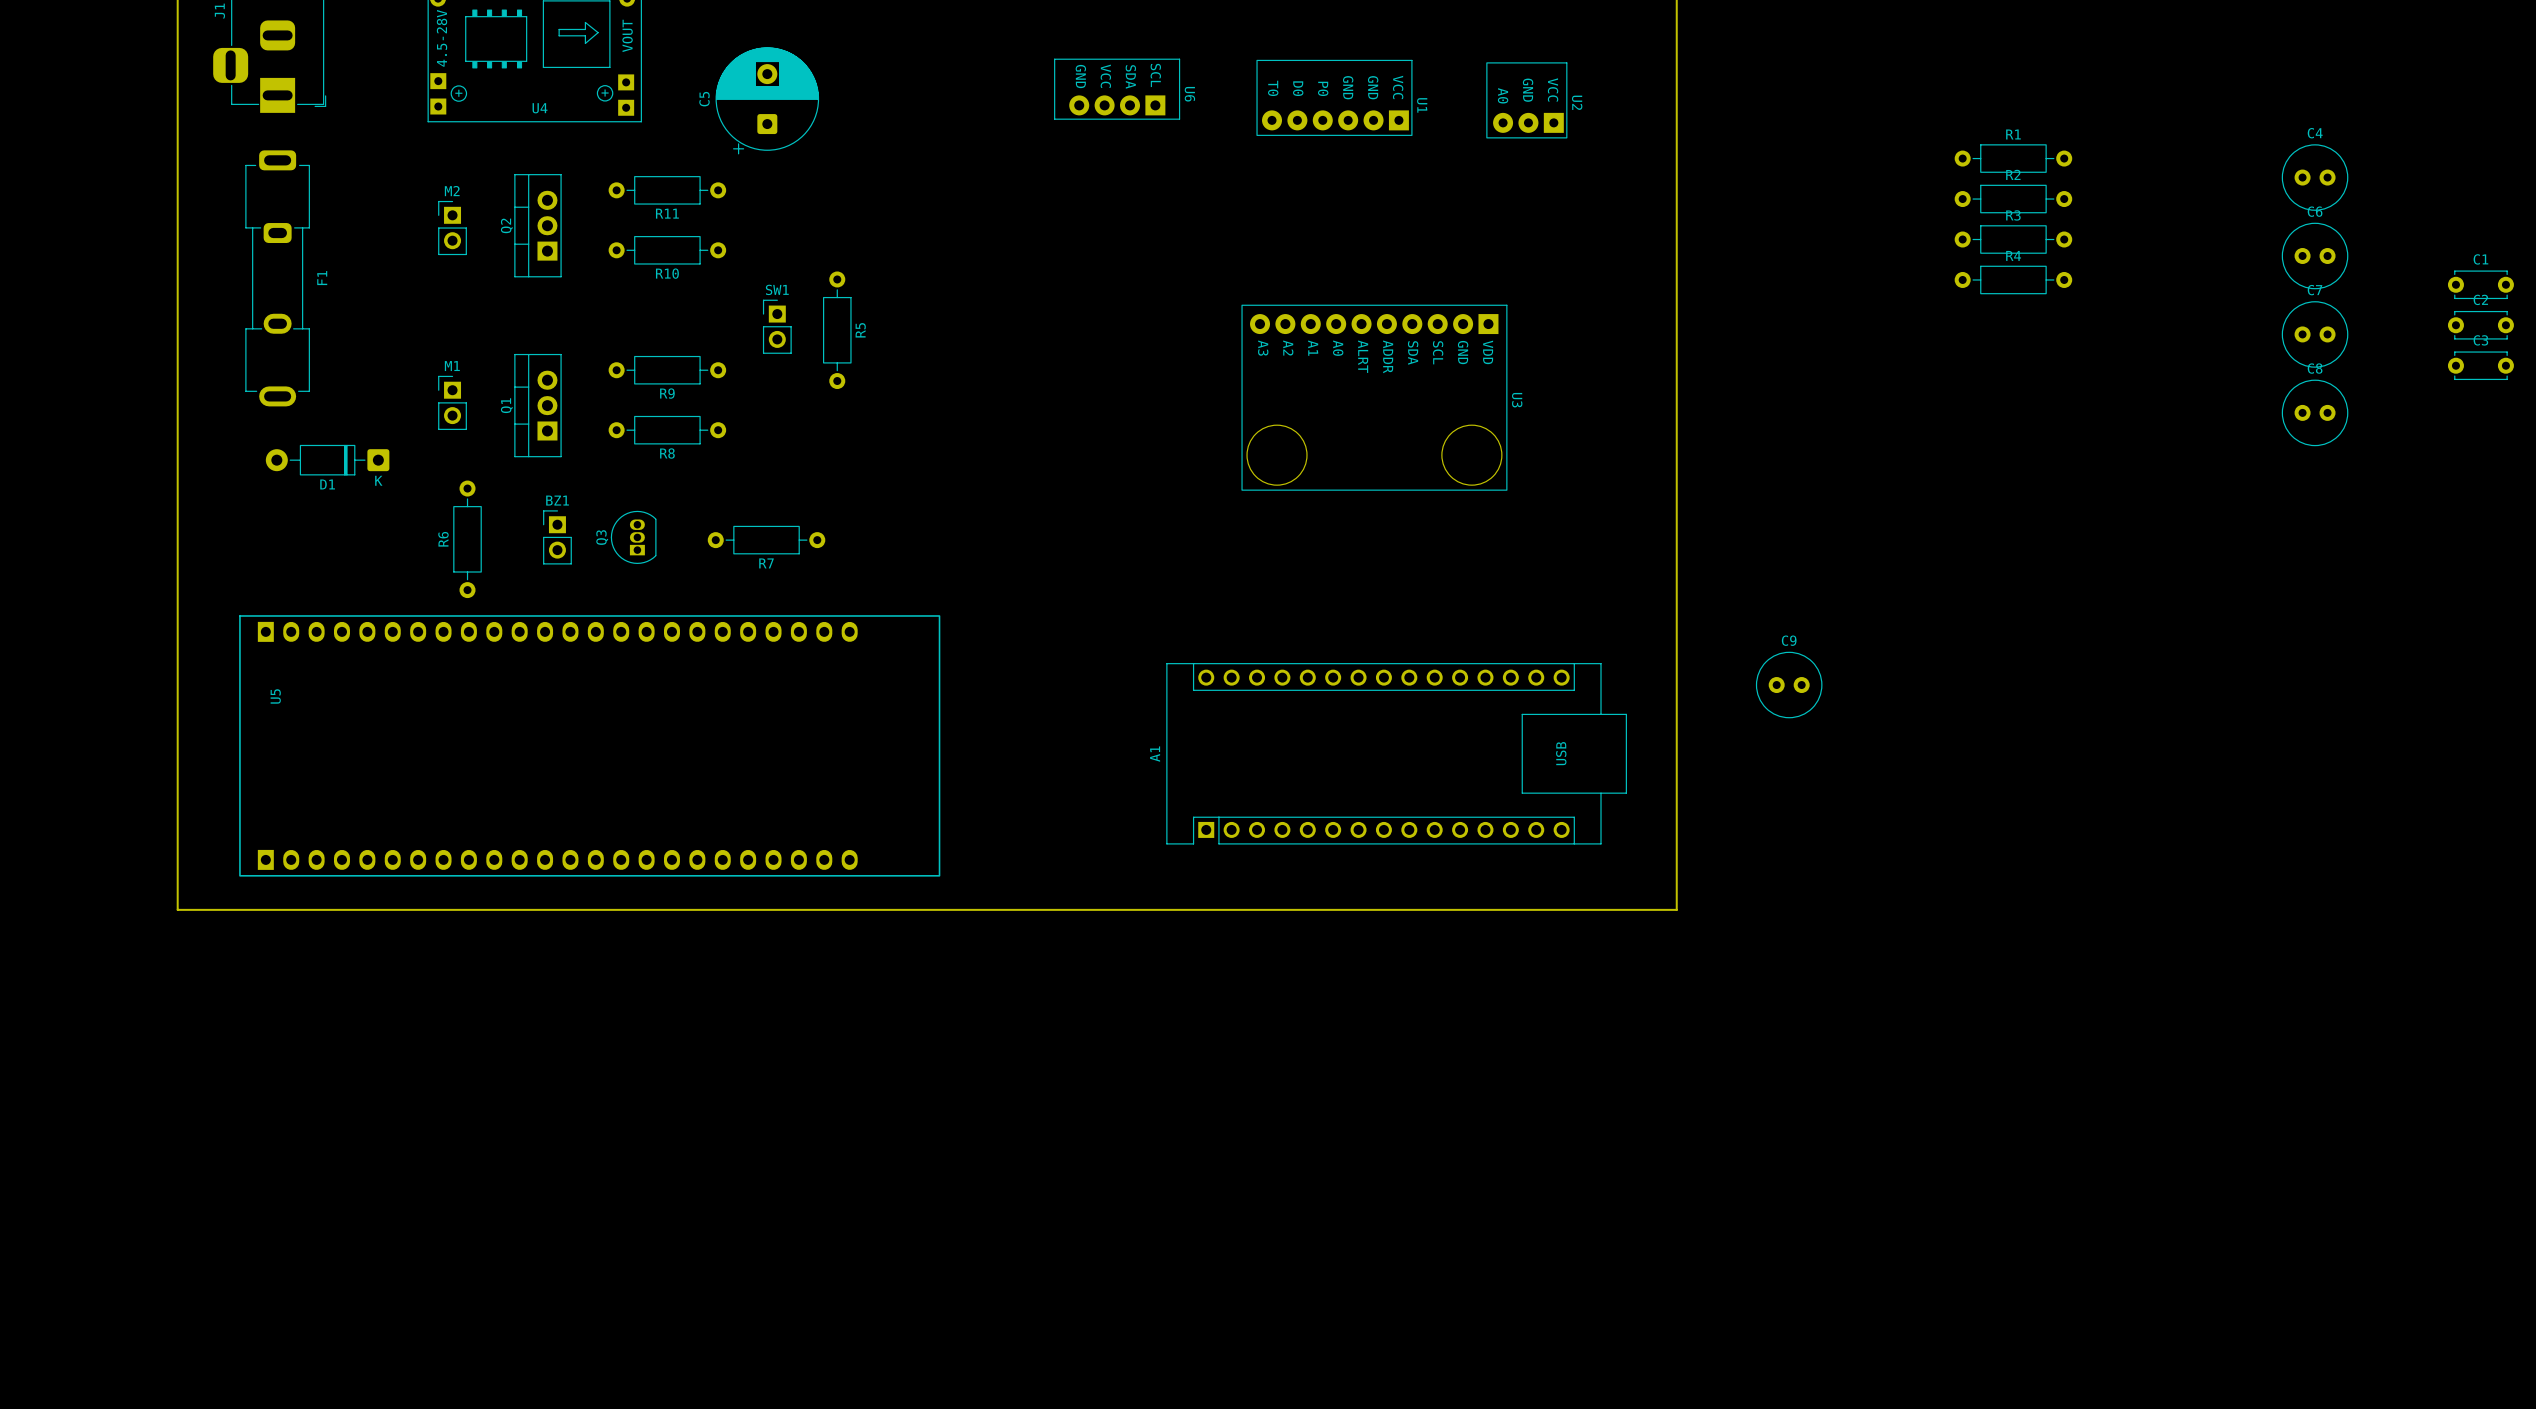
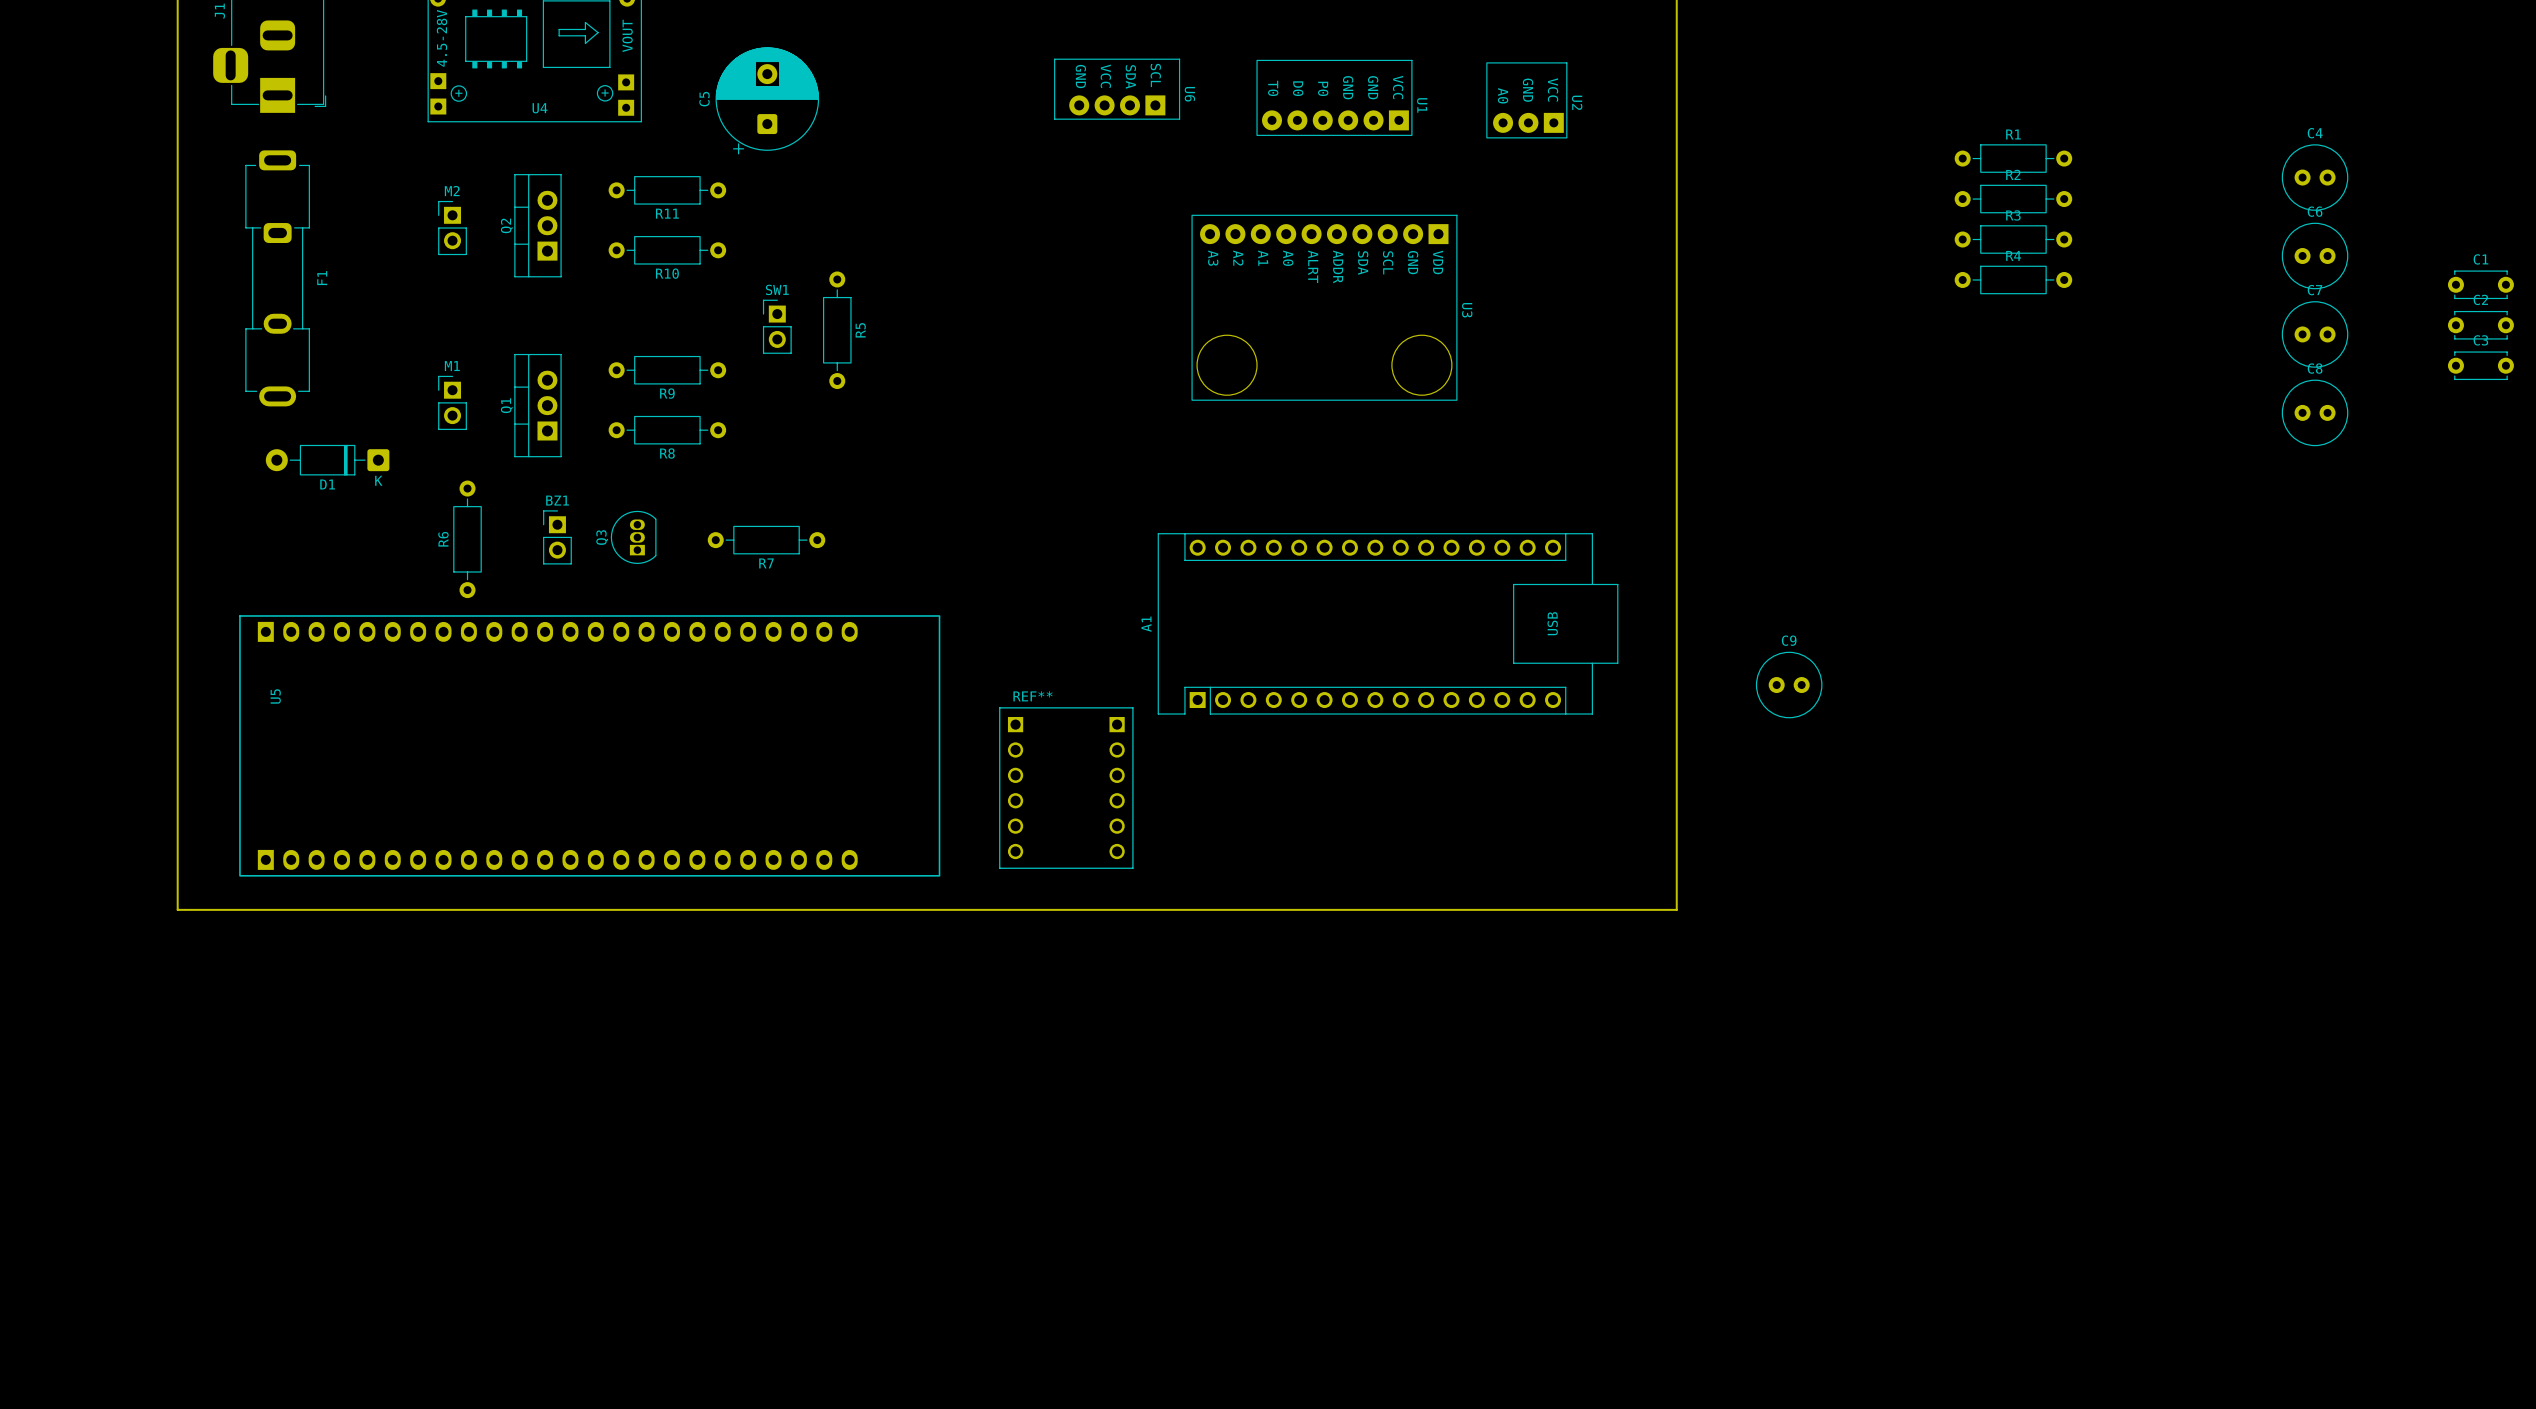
U3 position: (1374, 397) -> (1324, 307)
A1 position: (1396, 753) -> (1388, 623)
REF**: none -> (1066, 788)

